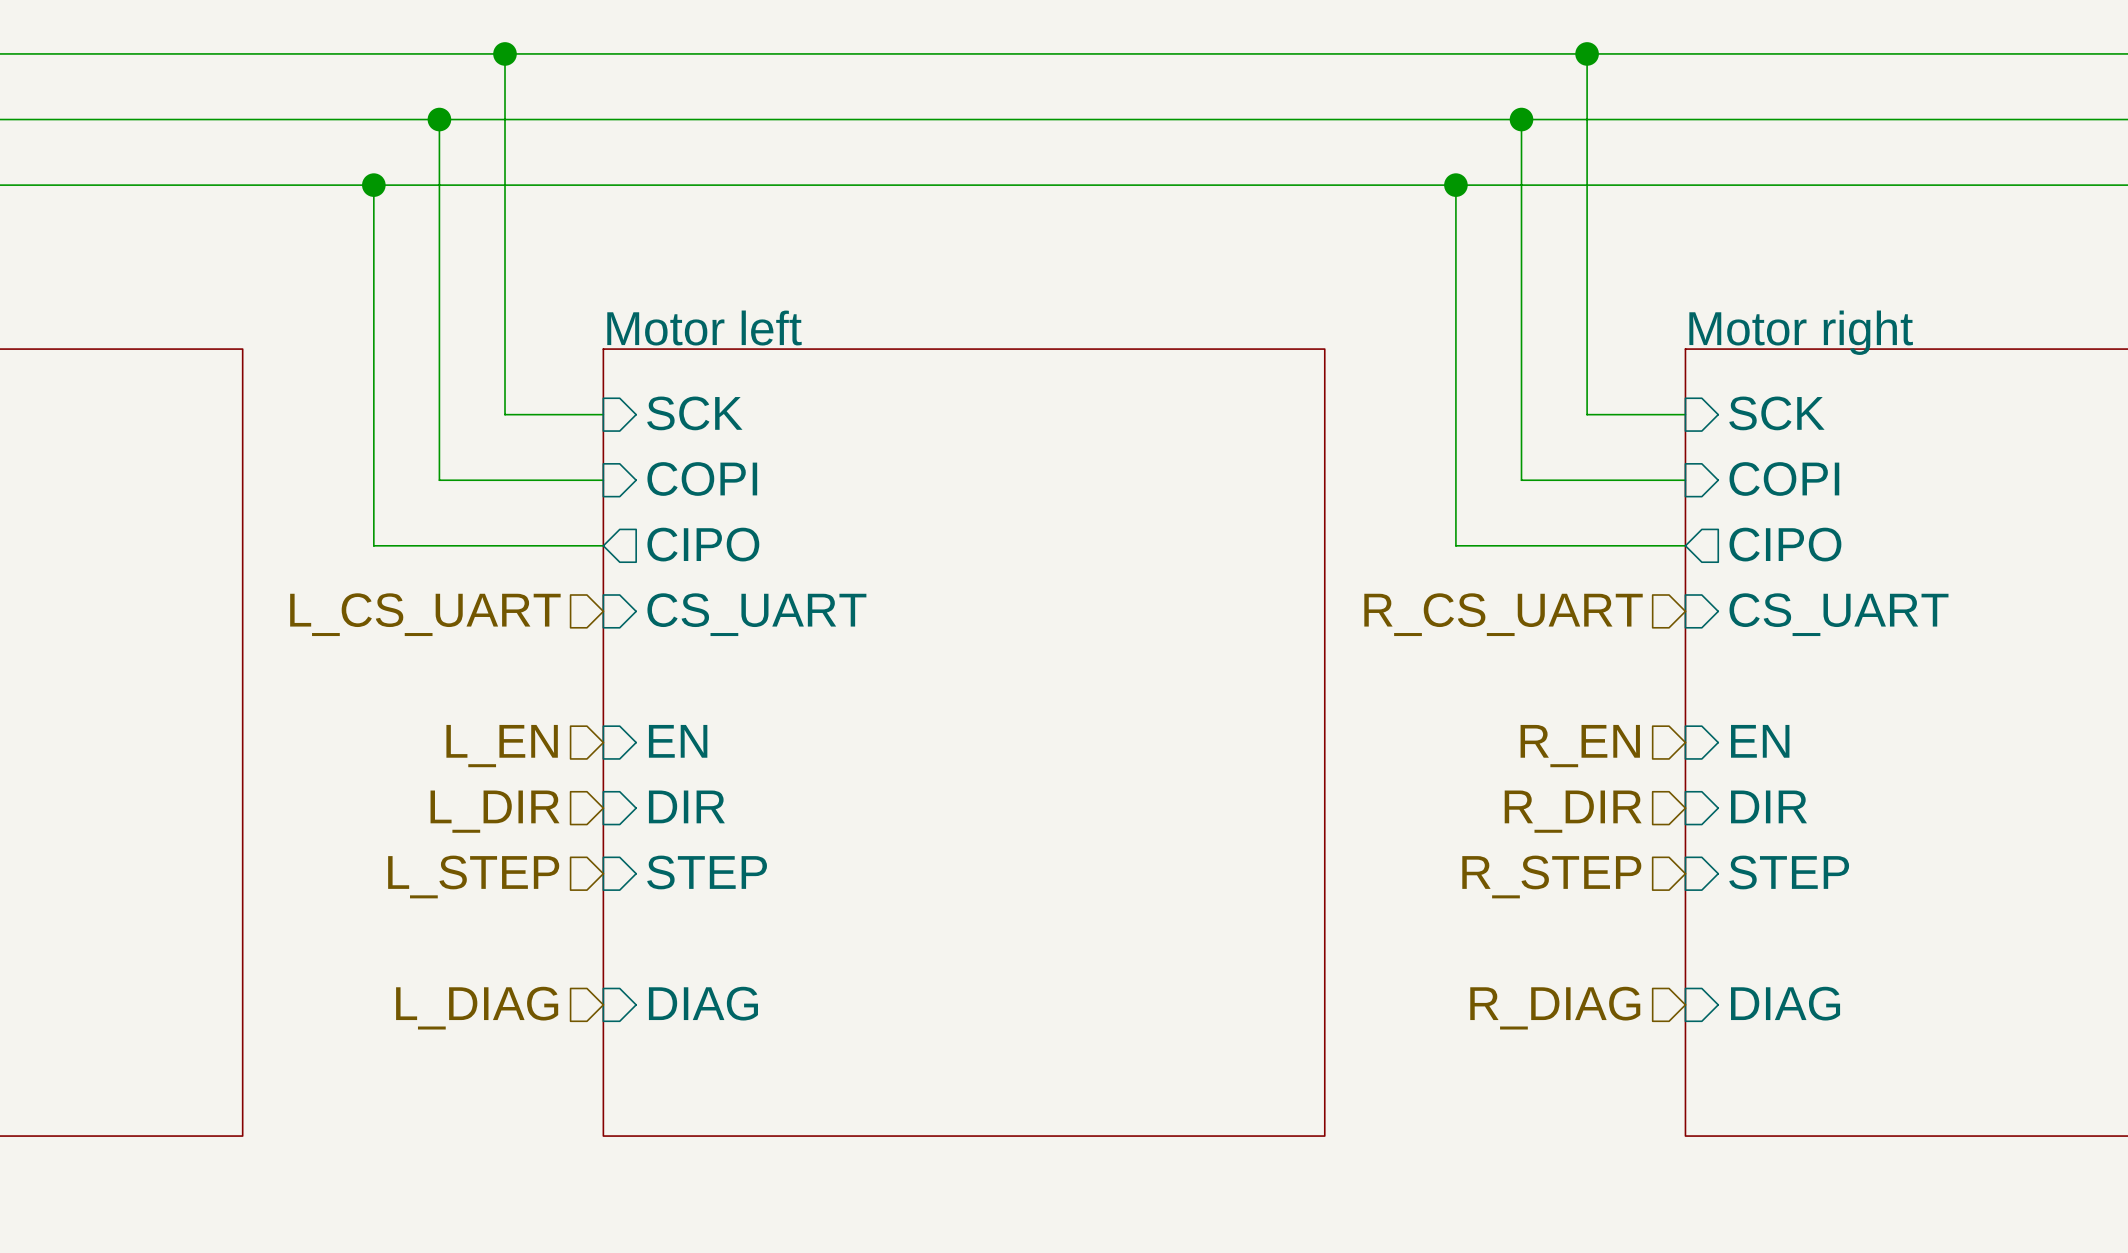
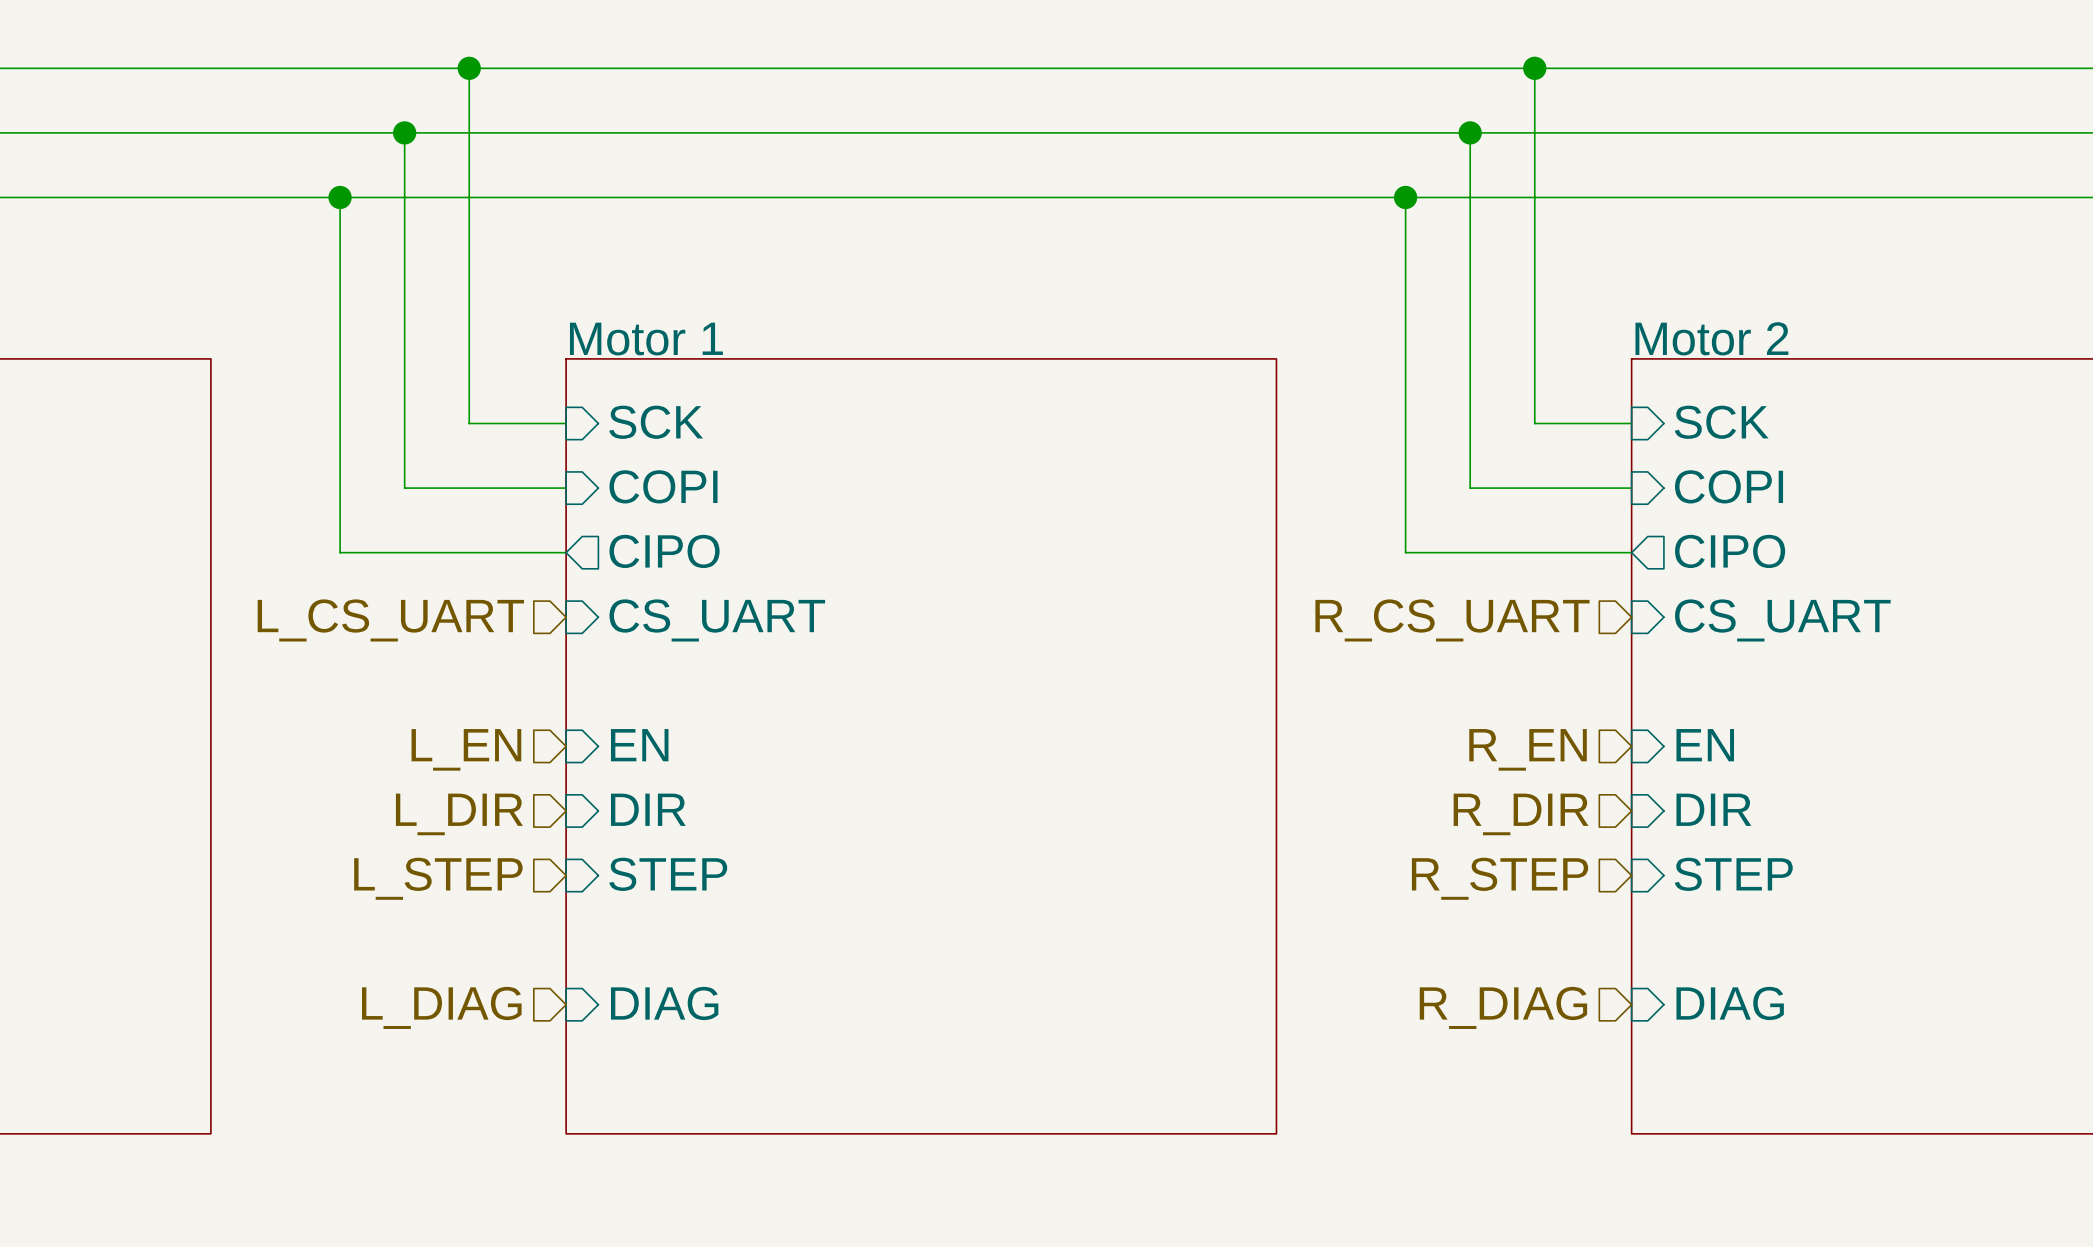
sheet Motor left name: Motor left (704, 328) -> Motor 1 (646, 339)
sheet Motor right name: Motor right (1801, 332) -> Motor 2 (1711, 338)

